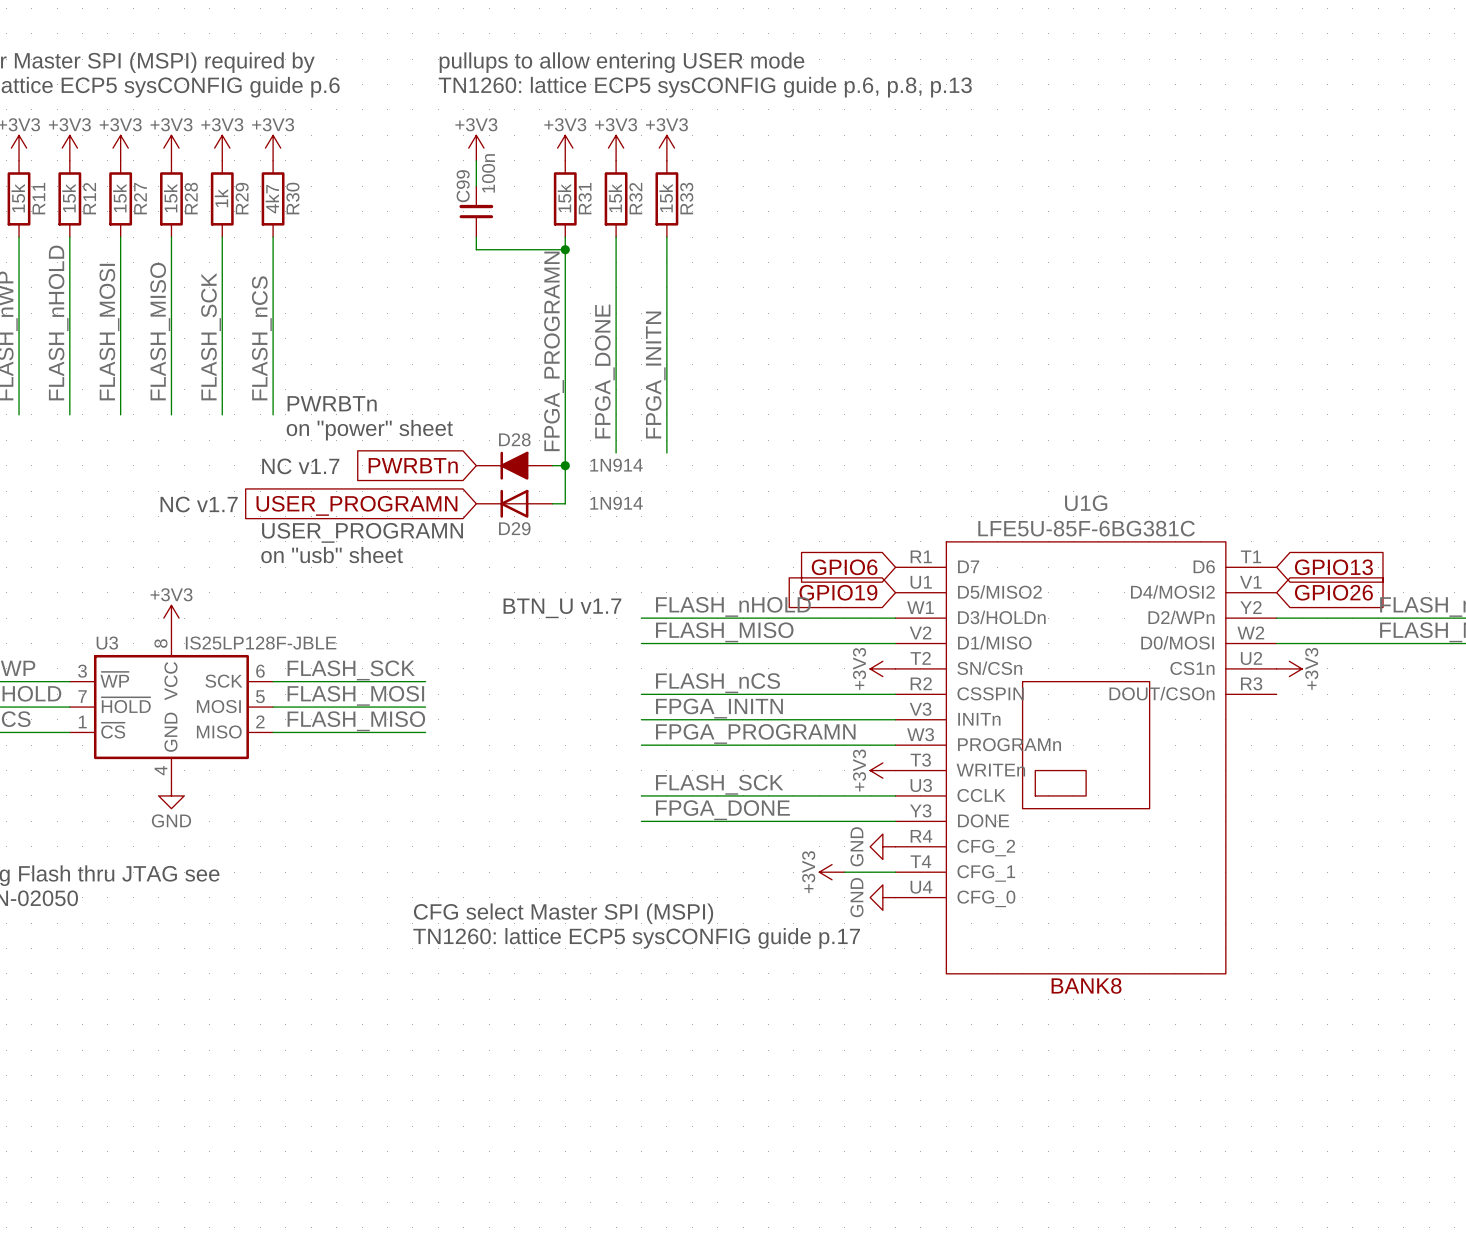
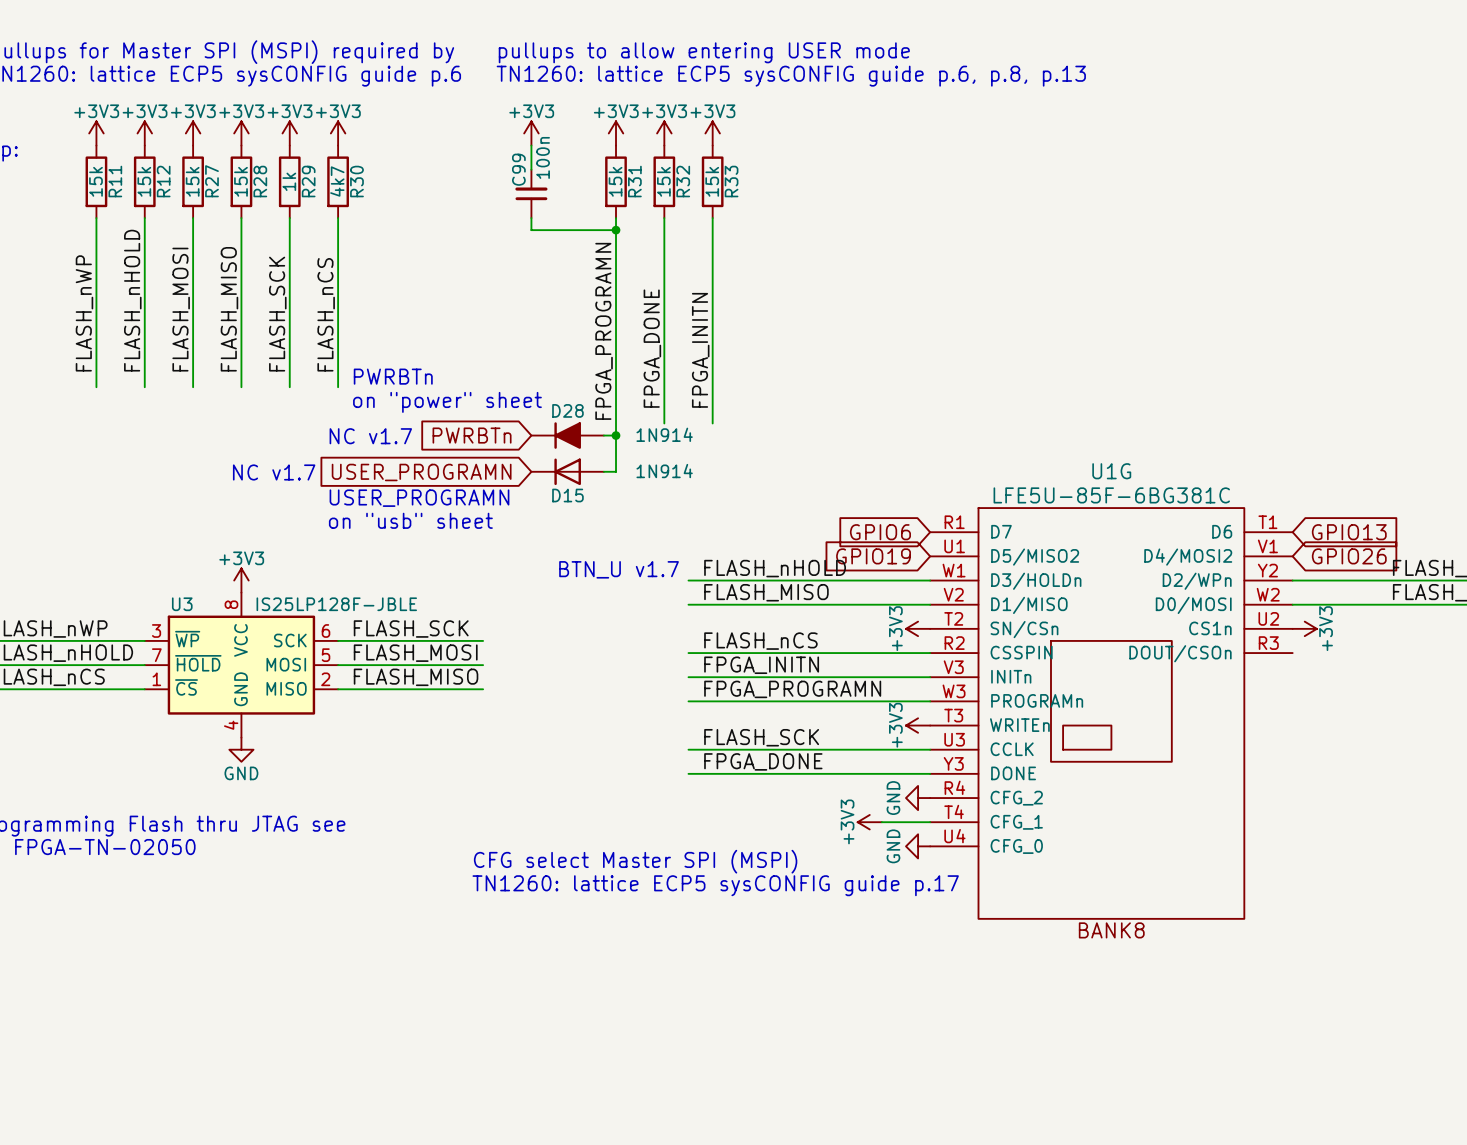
D29 name: D29 (514, 528) -> D15 (567, 495)

